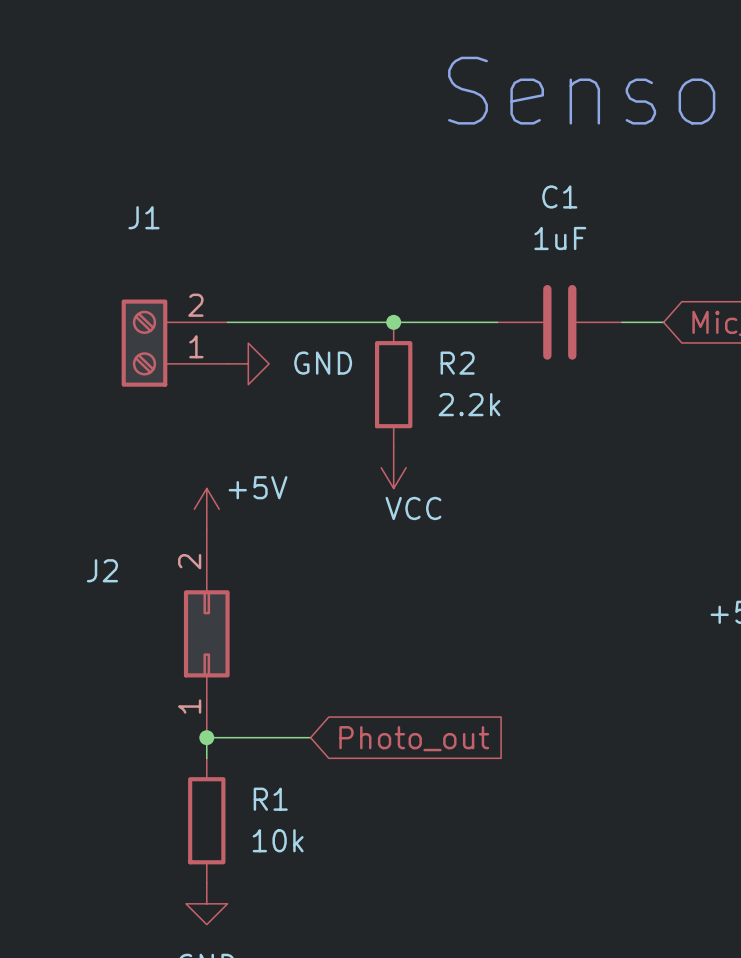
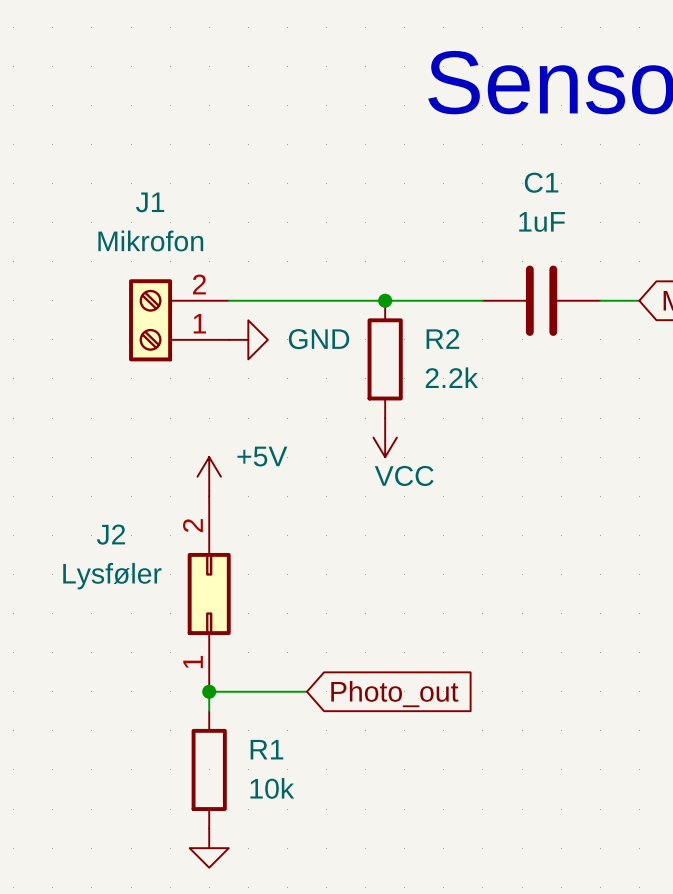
J1 value: none -> Mikrofon (150, 240)
J2 value: none -> Lysføler (112, 576)

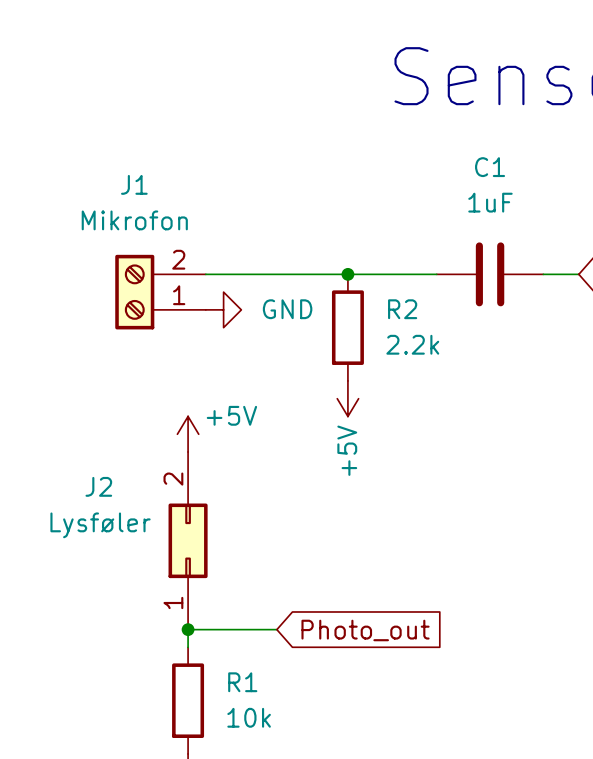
power symbol: VCC (385, 437) -> +5V (347, 398)

